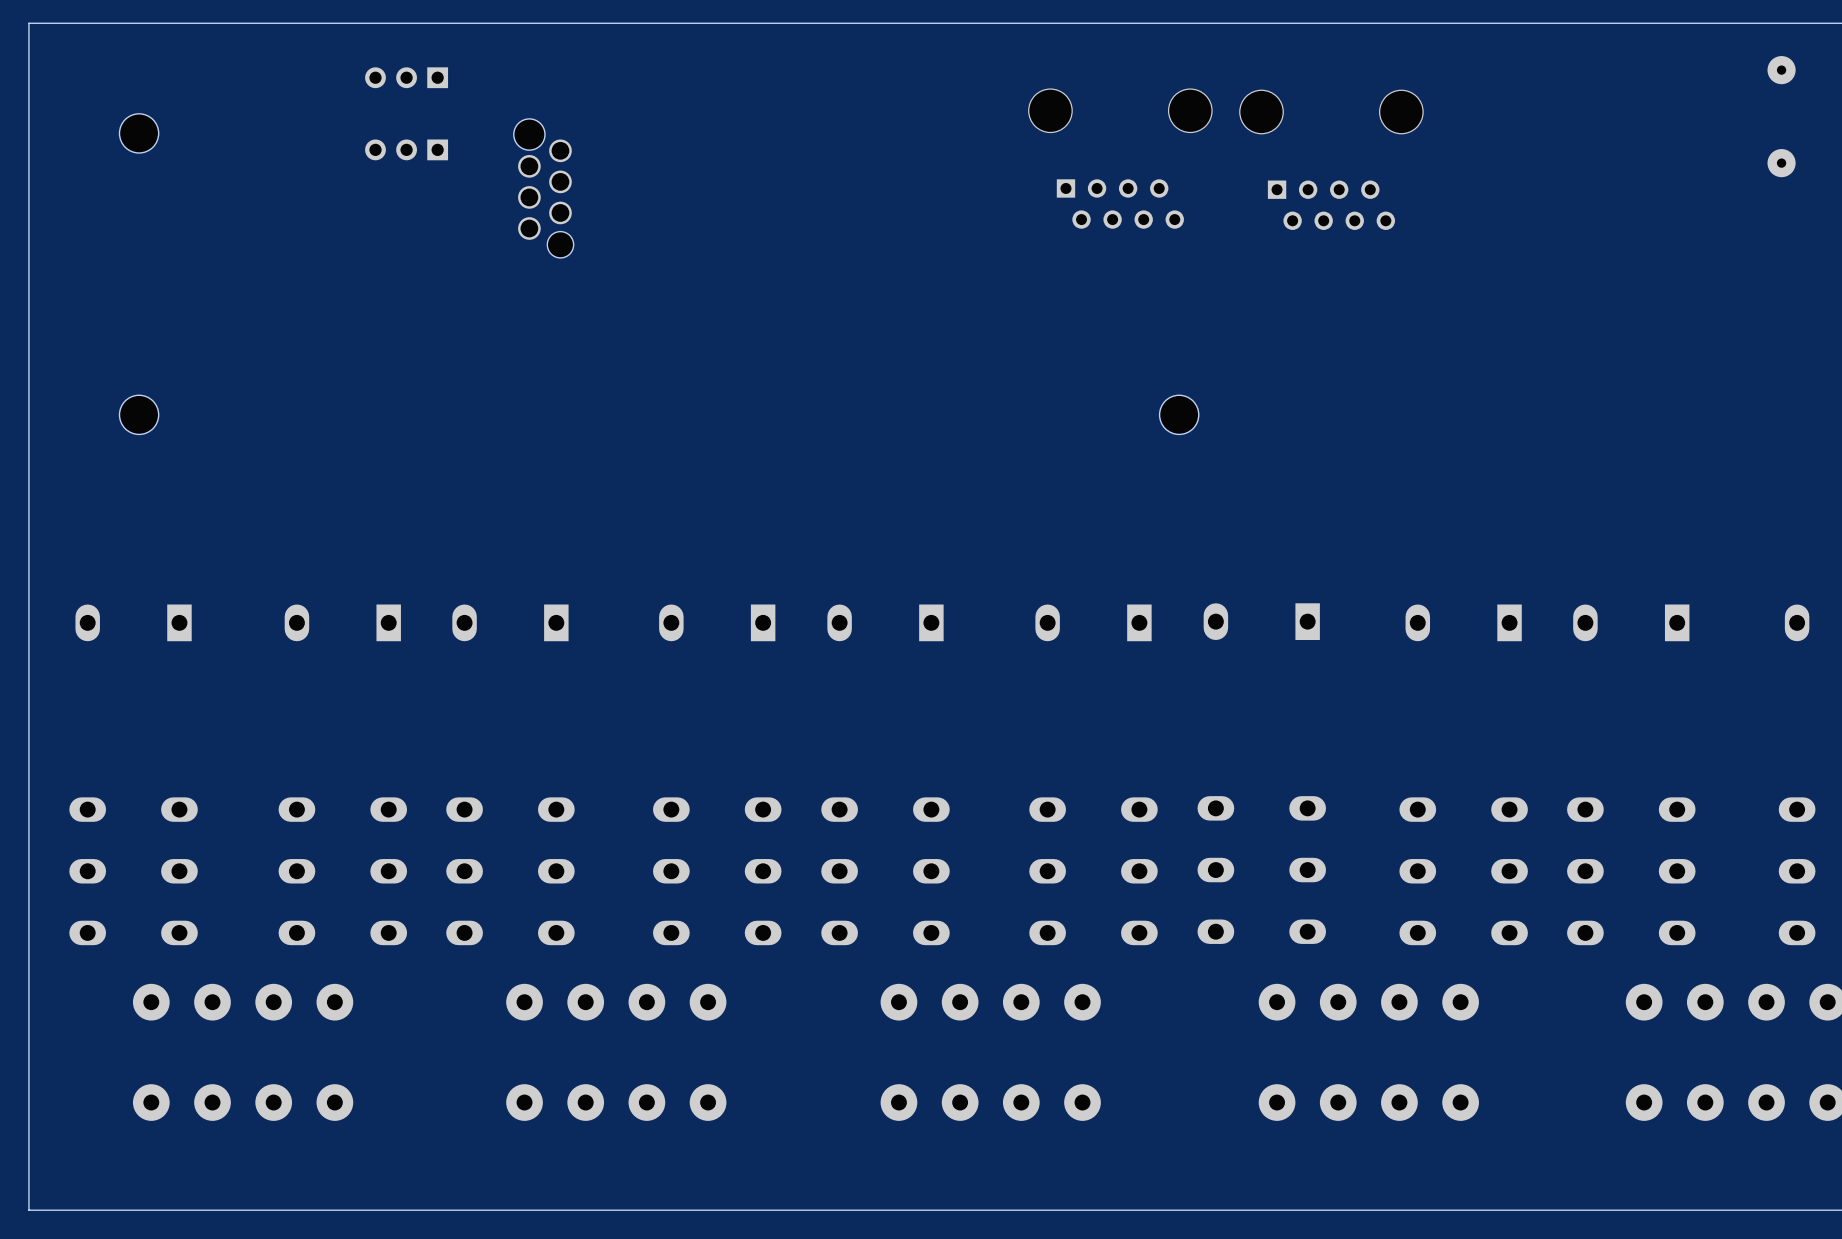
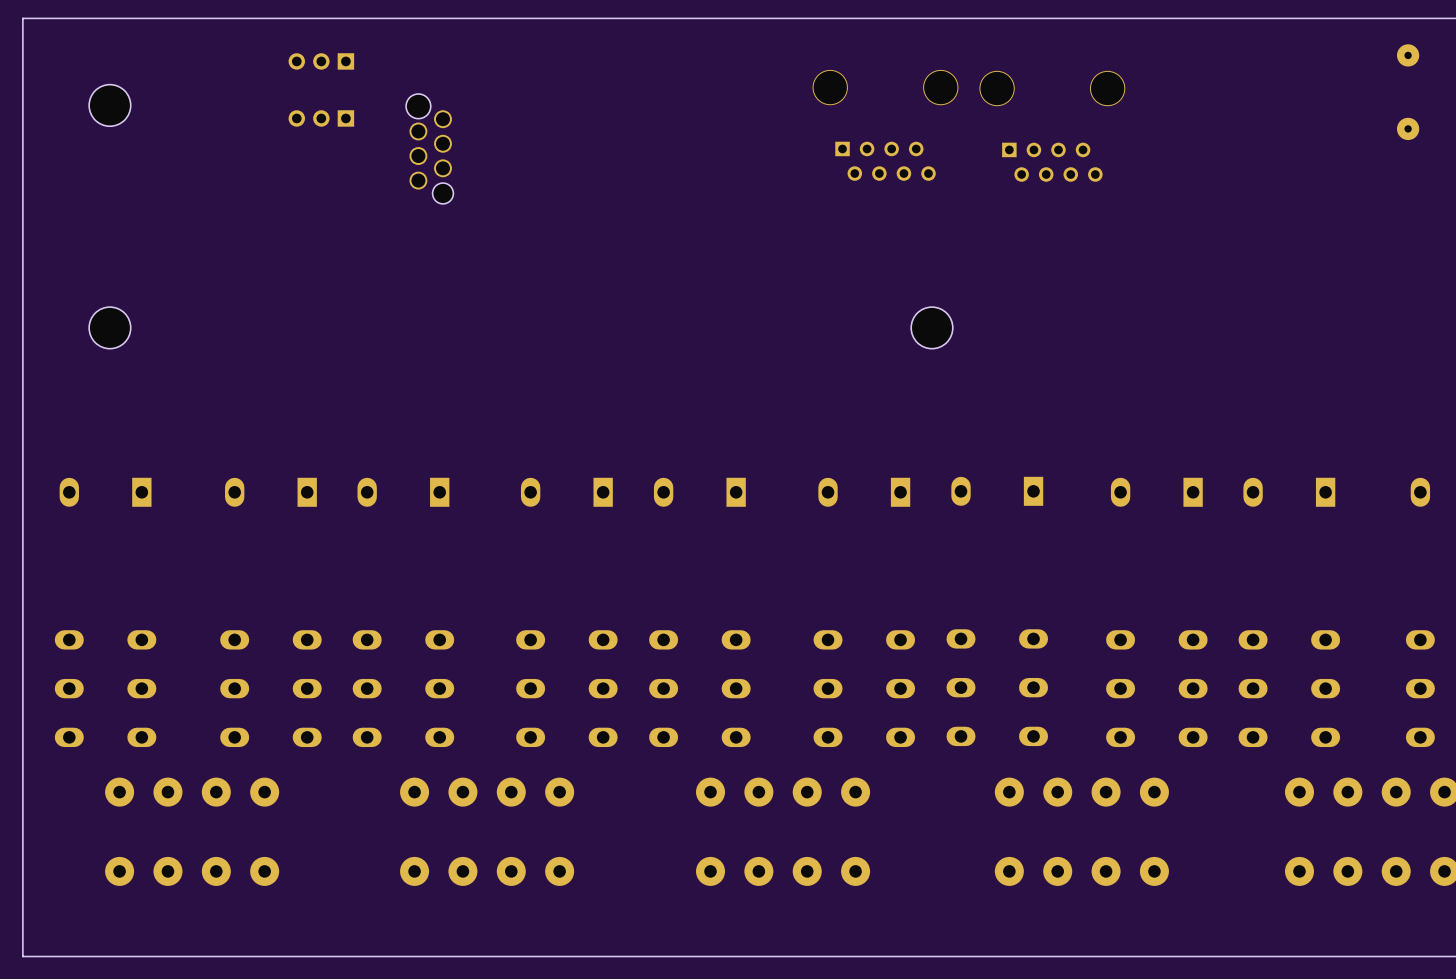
part footprint: [119, 113, 159, 153] -> [89, 84, 131, 127]
part footprint: [119, 395, 159, 435] -> [89, 307, 131, 349]
part footprint: [1159, 395, 1199, 435] -> [911, 307, 953, 349]

